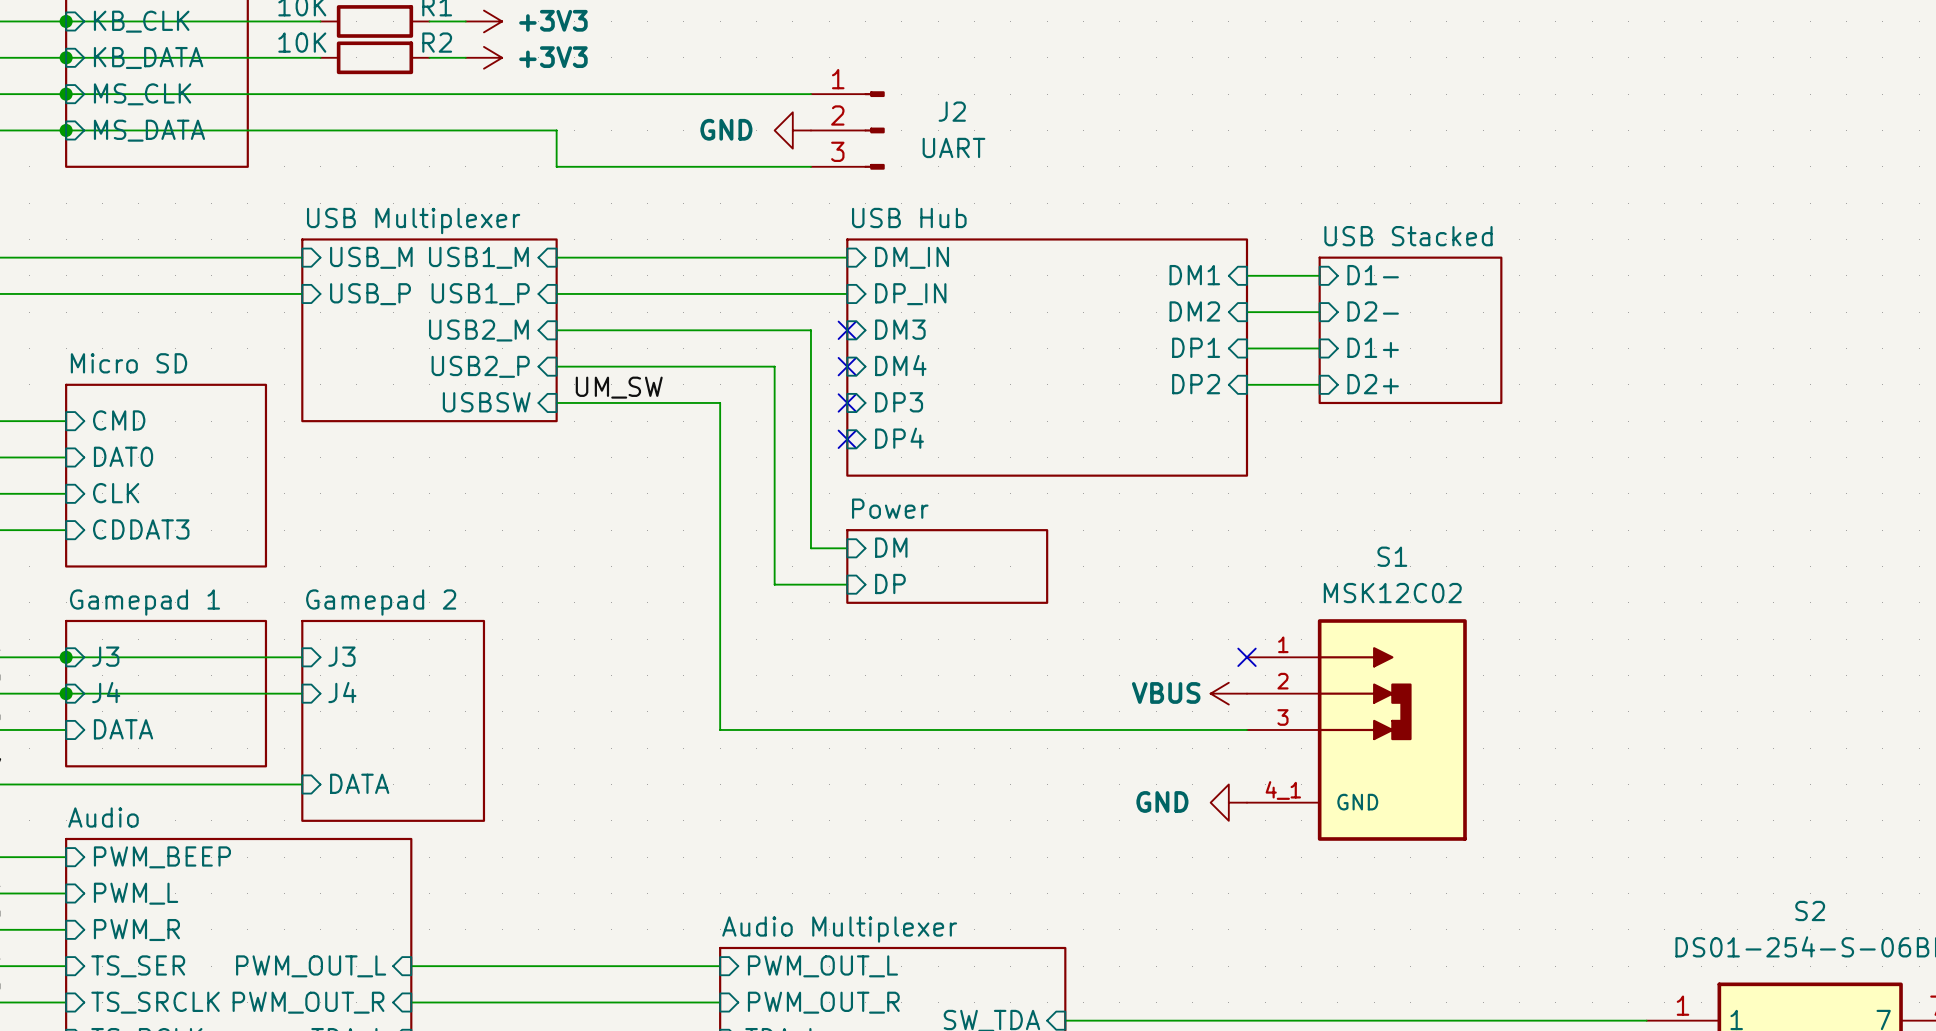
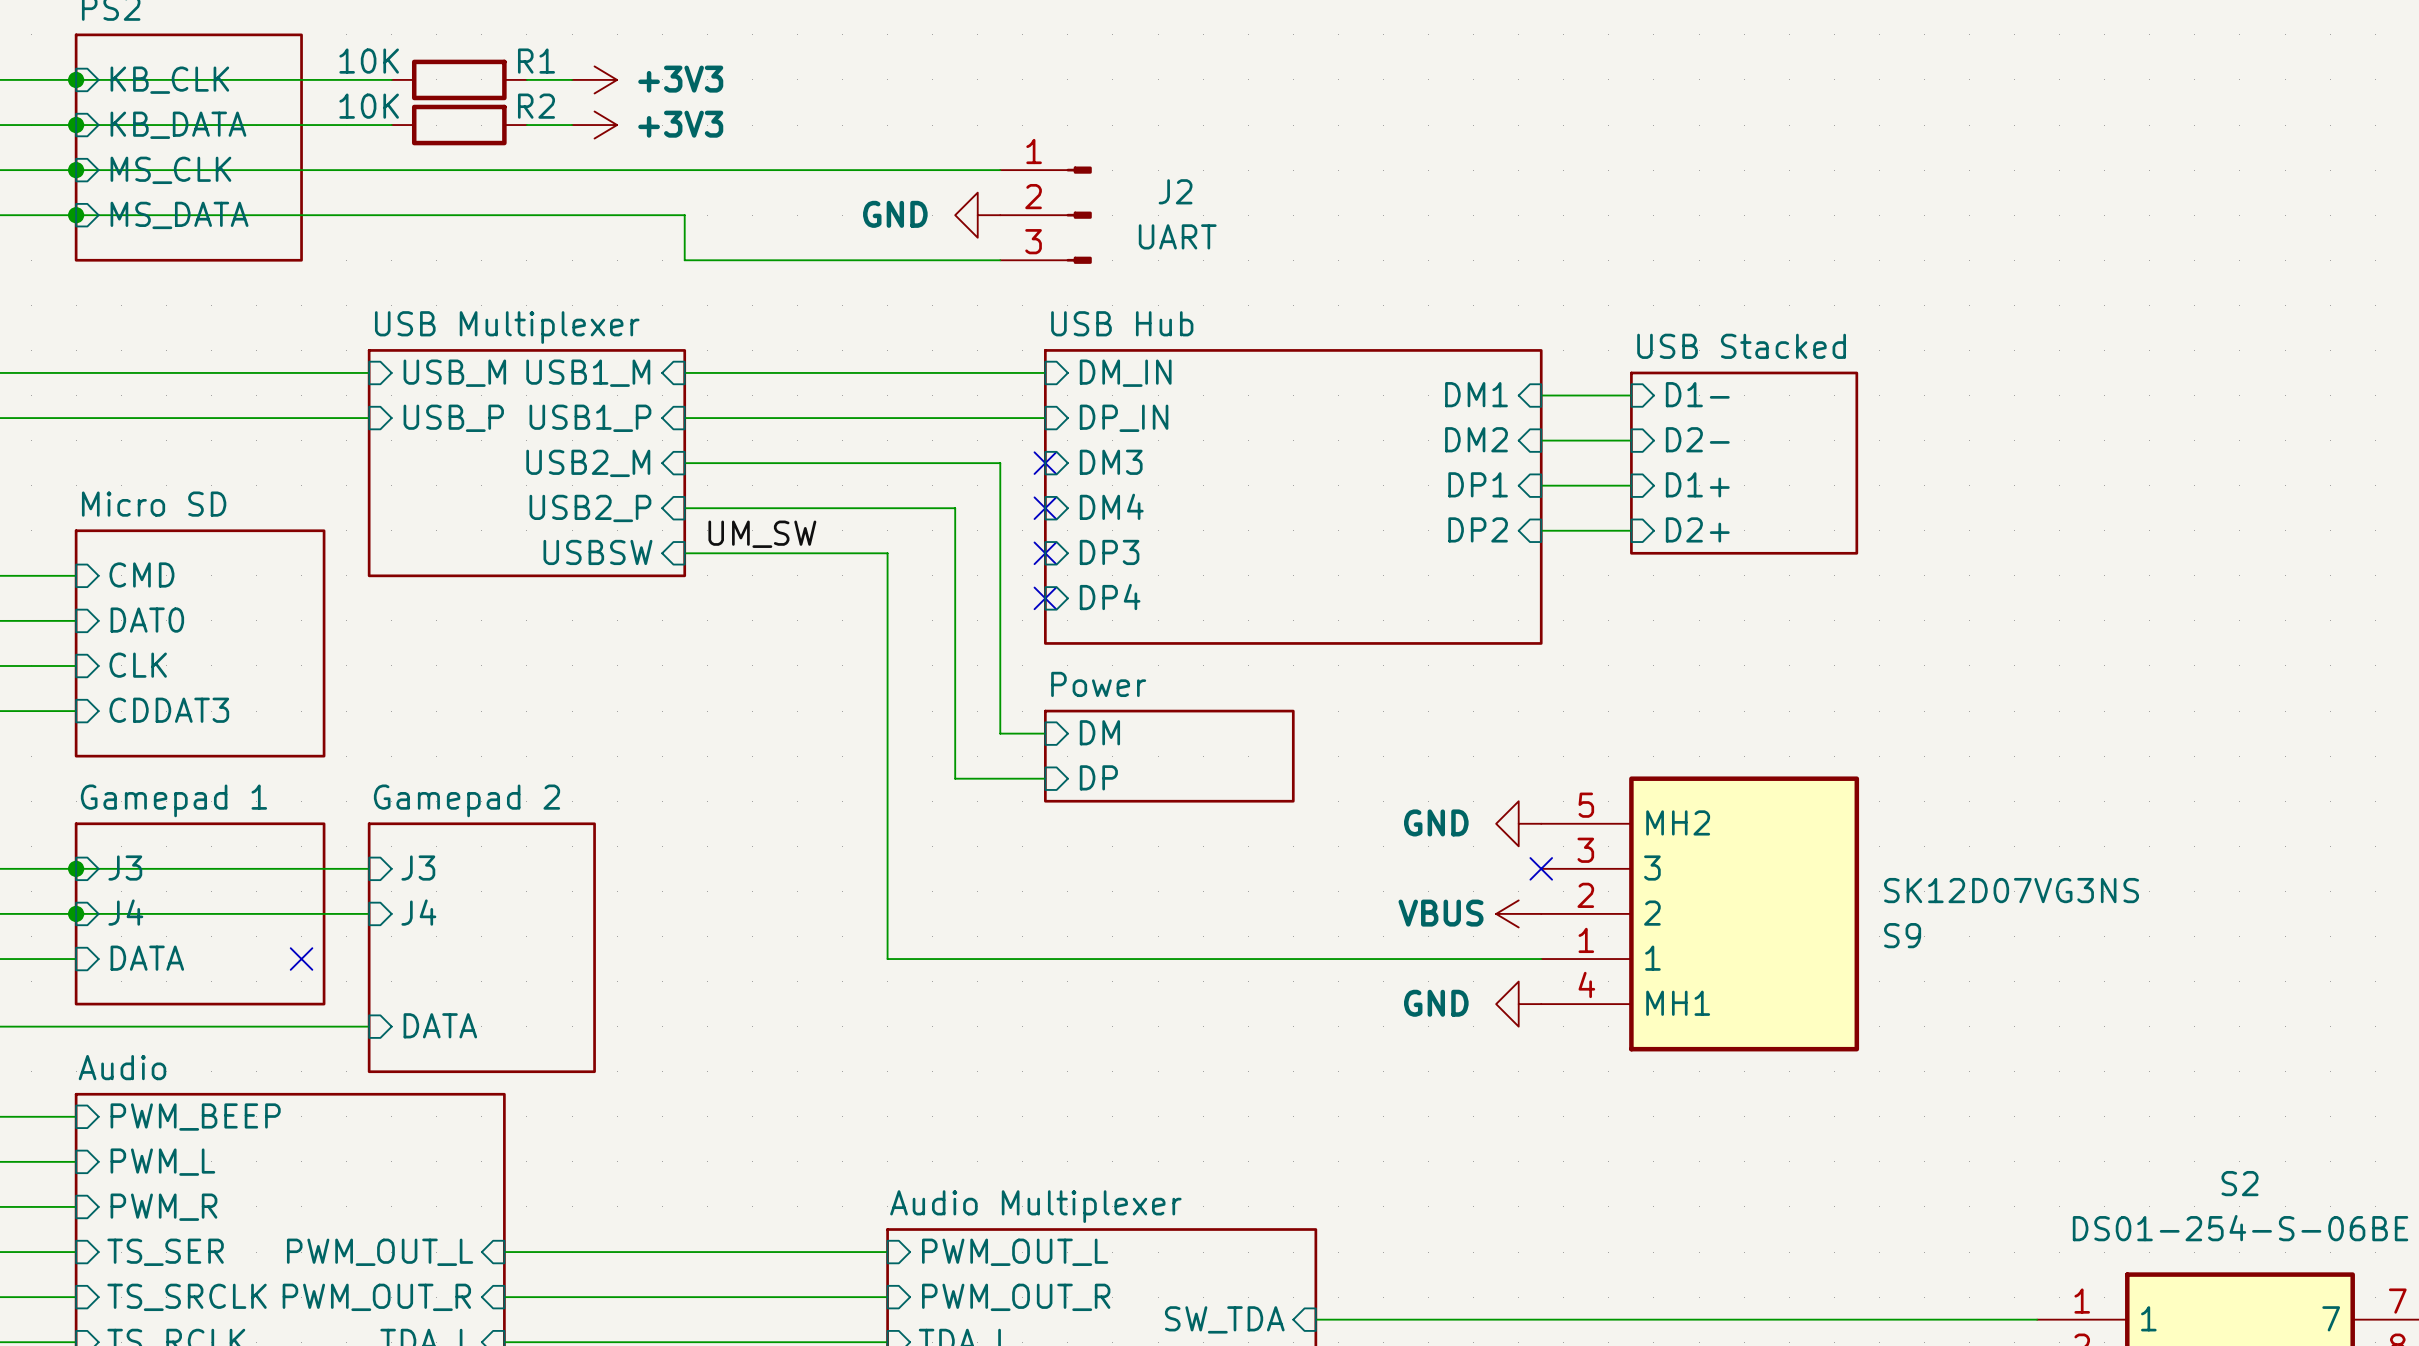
power symbol: none -> GND (1518, 823)
S9: none -> SK12D07VG3NS (1700, 913)
no-connect mark: none -> (301, 959)
S1: MSK12C02 (1356, 729) -> none
power symbol position: GND (1228, 802) -> GND (1518, 1004)

